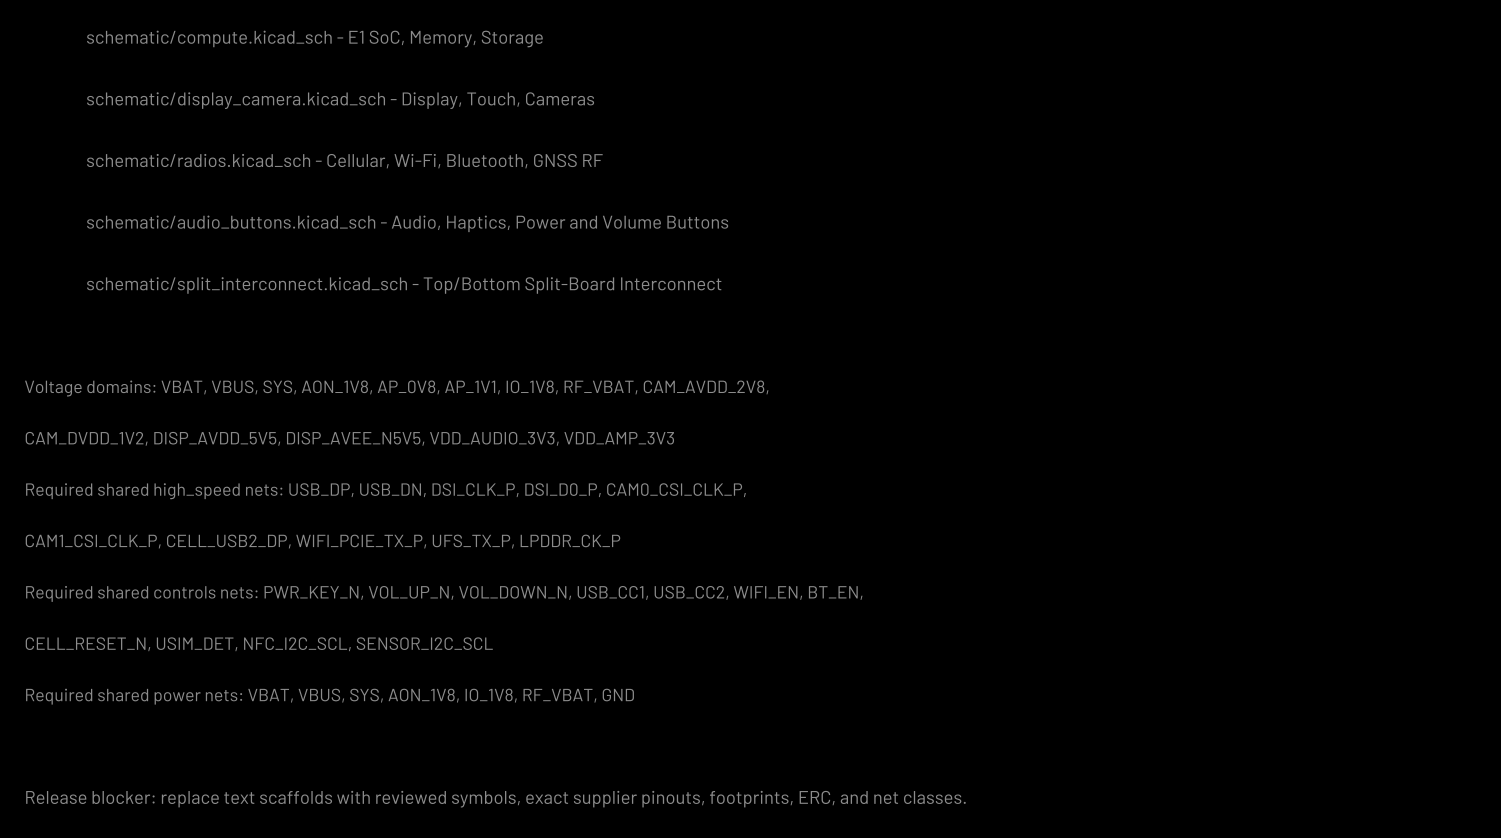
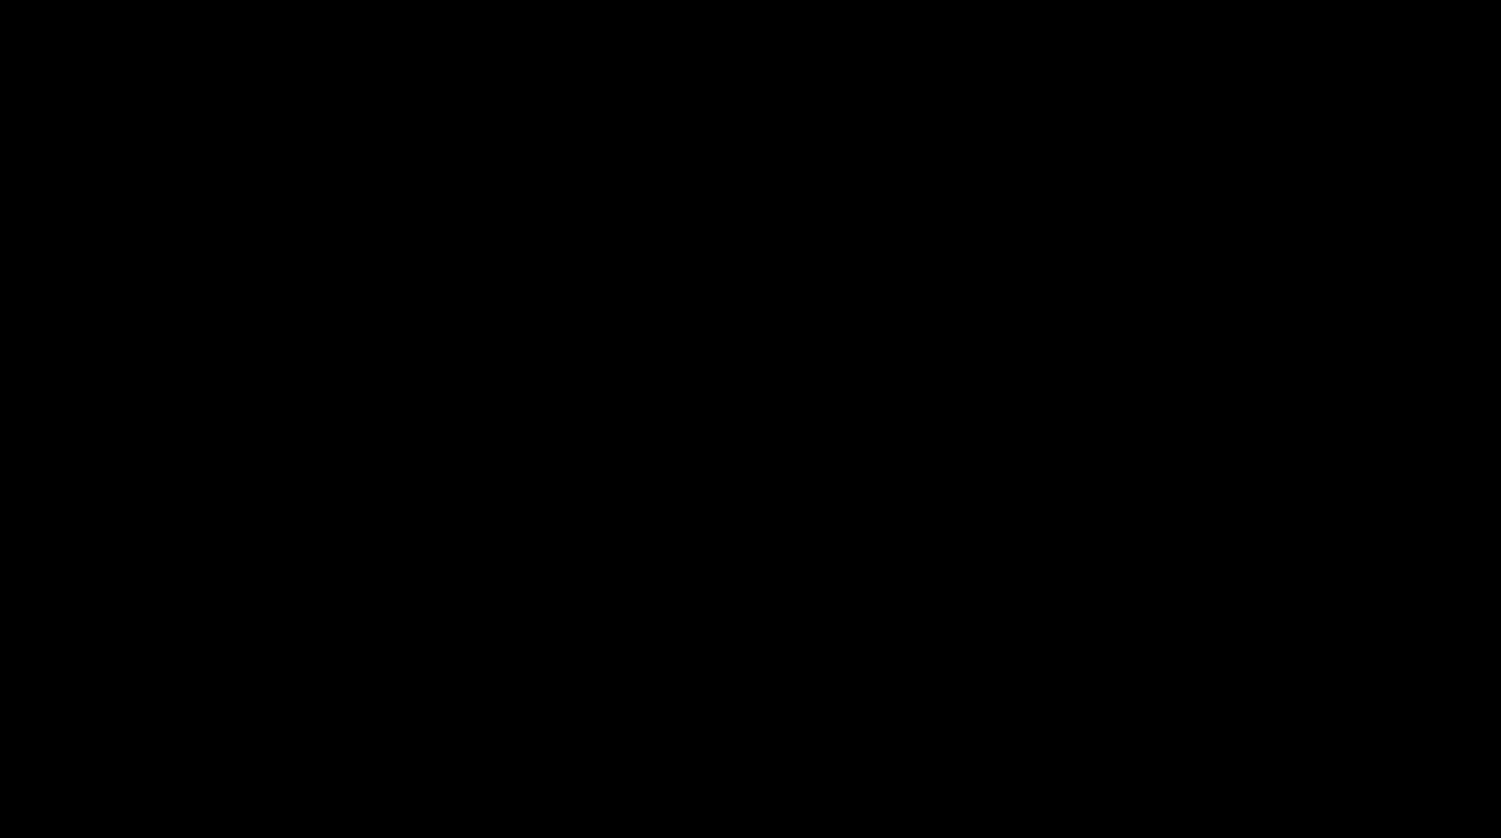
text: schematic/compute.kicad_sch - E1 SoC, Memory, Storage (314, 39) -> none
text: schematic/display_camera.kicad_sch - Display, Touch, Cameras (340, 100) -> none
text: schematic/radios.kicad_sch - Cellular, Wi-Fi, Bluetooth, GNSS RF (344, 161) -> none
text: schematic/audio_buttons.kicad_sch - Audio, Haptics, Power and Volume Buttons (407, 223) -> none
text: schematic/split_interconnect.kicad_sch - Top/Bottom Split-Board Interconnect (404, 285) -> none
text: Voltage domains: VBAT, VBUS, SYS, AON_1V8, AP_0V8, AP_1V1, IO_1V8, RF_VBAT, CAM_AVDD_2V8, (396, 388) -> none
text: CAM_DVDD_1V2, DISP_AVDD_5V5, DISP_AVEE_N5V5, VDD_AUDIO_3V3, VDD_AMP_3V3 (349, 438) -> none
text: Required shared high_speed nets: USB_DP, USB_DN, DSI_CLK_P, DSI_D0_P, CAM0_CSI_CLK_P, (385, 491) -> none
text: CAM1_CSI_CLK_P, CELL_USB2_DP, WIFI_PCIE_TX_P, UFS_TX_P, LPDDR_CK_P (322, 541) -> none
text: Required shared controls nets: PWR_KEY_N, VOL_UP_N, VOL_DOWN_N, USB_CC1, USB_CC2, WIFI_EN, BT_EN, (444, 593) -> none
text: CELL_RESET_N, USIM_DET, NFC_I2C_SCL, SENSOR_I2C_SCL (259, 644) -> none
text: Required shared power nets: VBAT, VBUS, SYS, AON_1V8, IO_1V8, RF_VBAT, GND (330, 696) -> none
text: Release blocker: replace text scaffolds with reviewed symbols, exact supplier pinouts, footprints, ERC, and net classes. (495, 799) -> none

